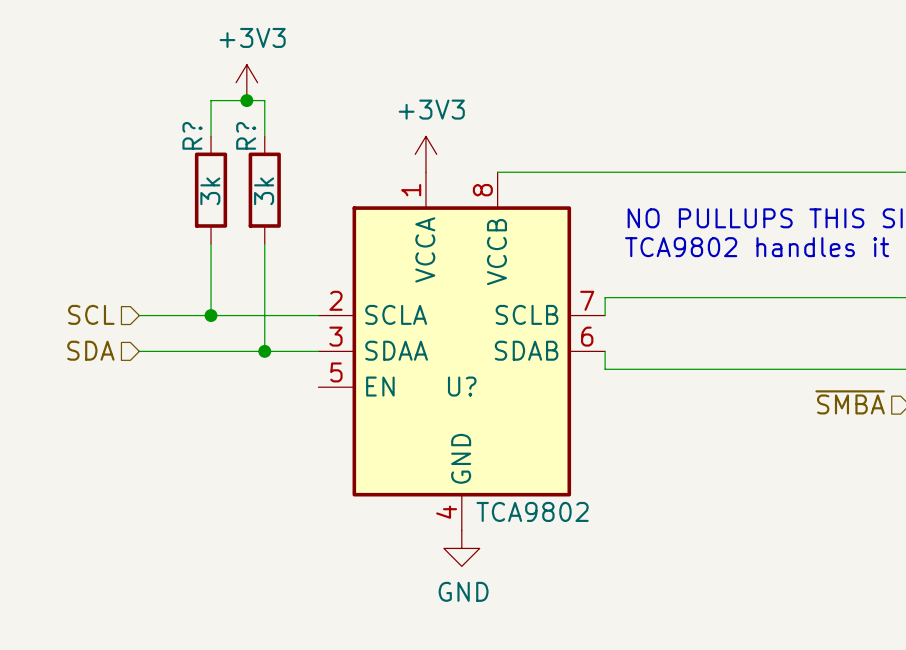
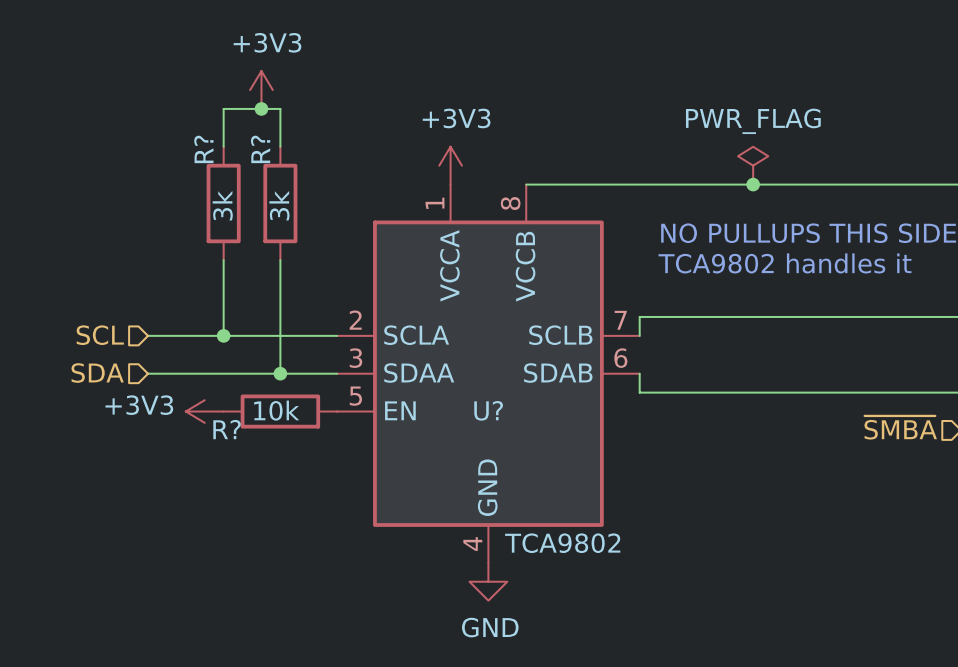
power symbol: none -> PWR_FLAG (753, 165)
junction: none -> (753, 184)
power symbol: none -> +3V3 (204, 411)
R?: none -> 10k (280, 411)

